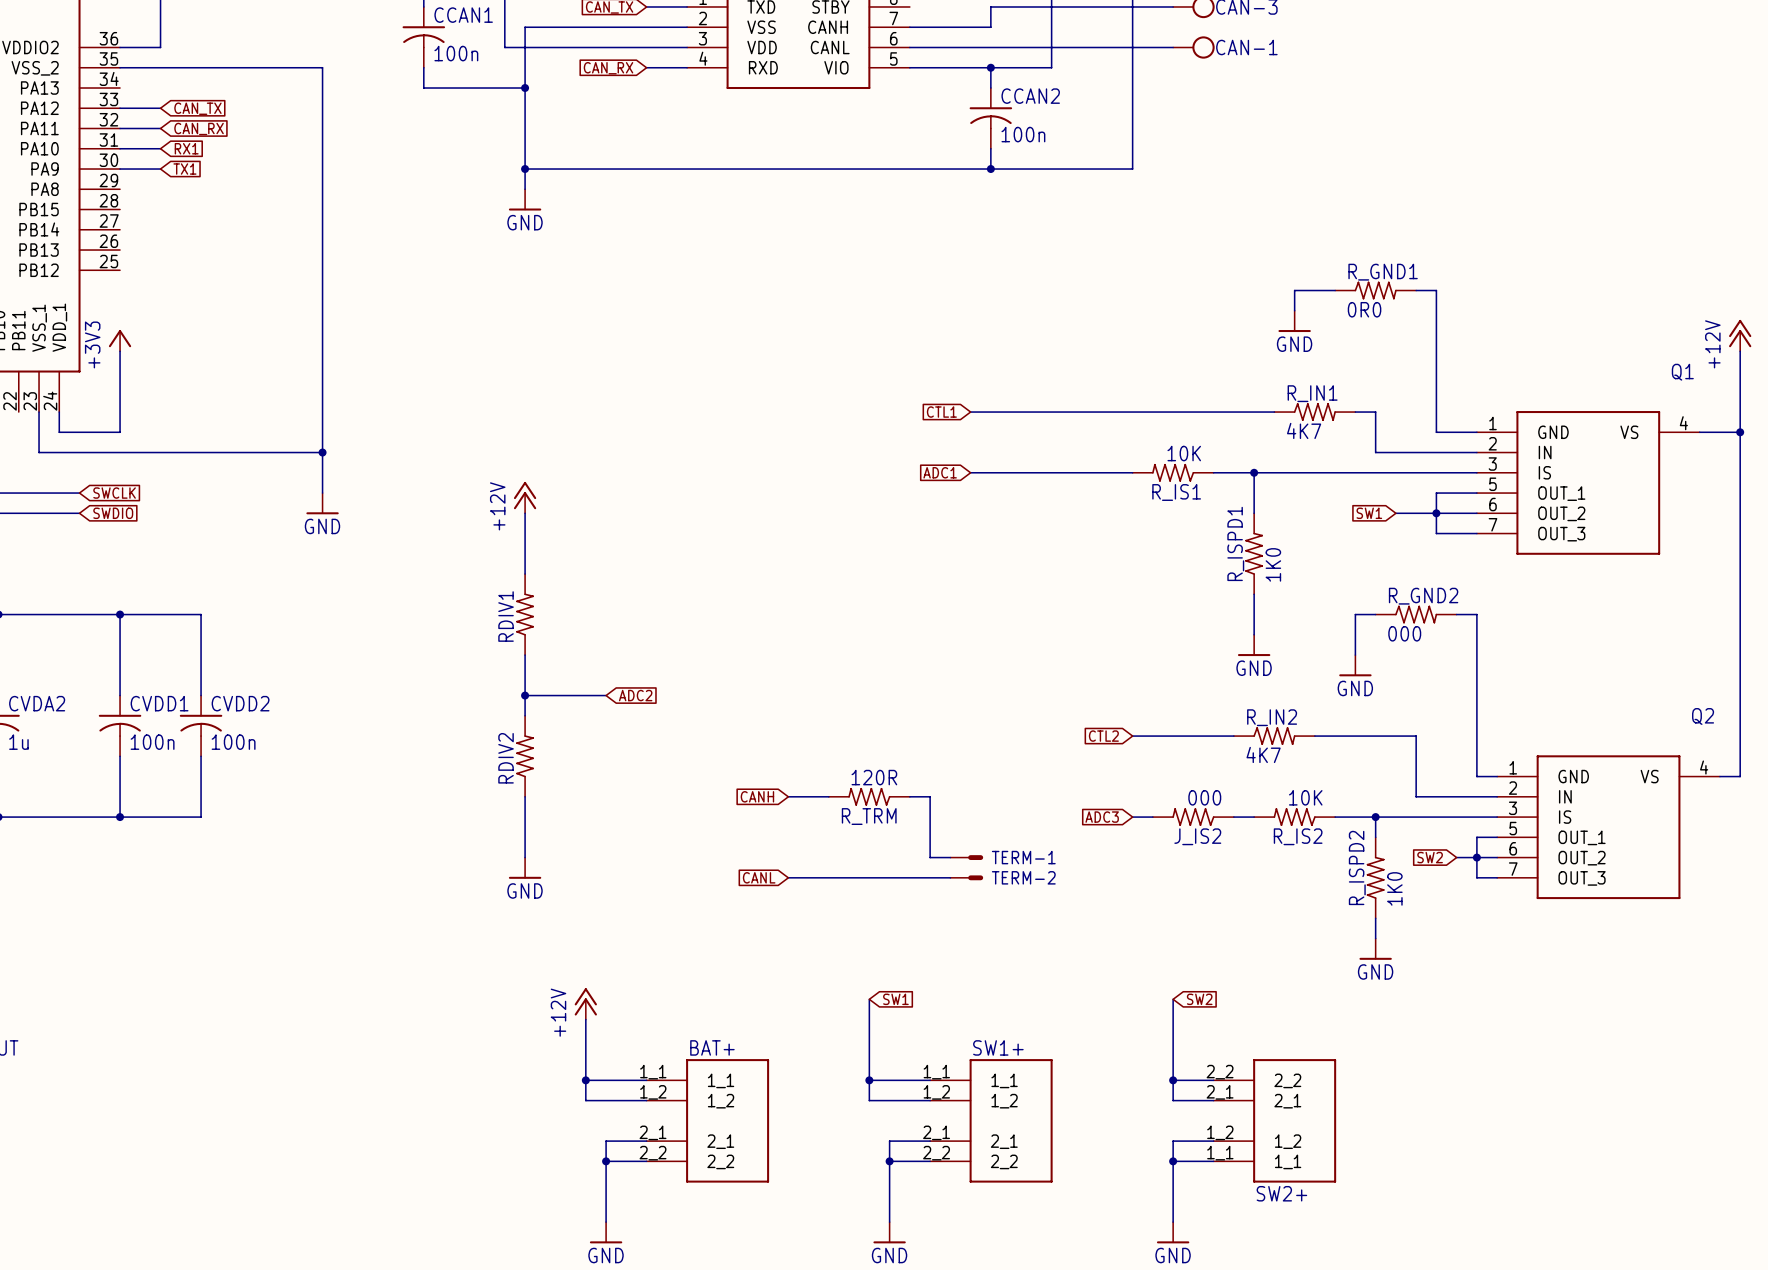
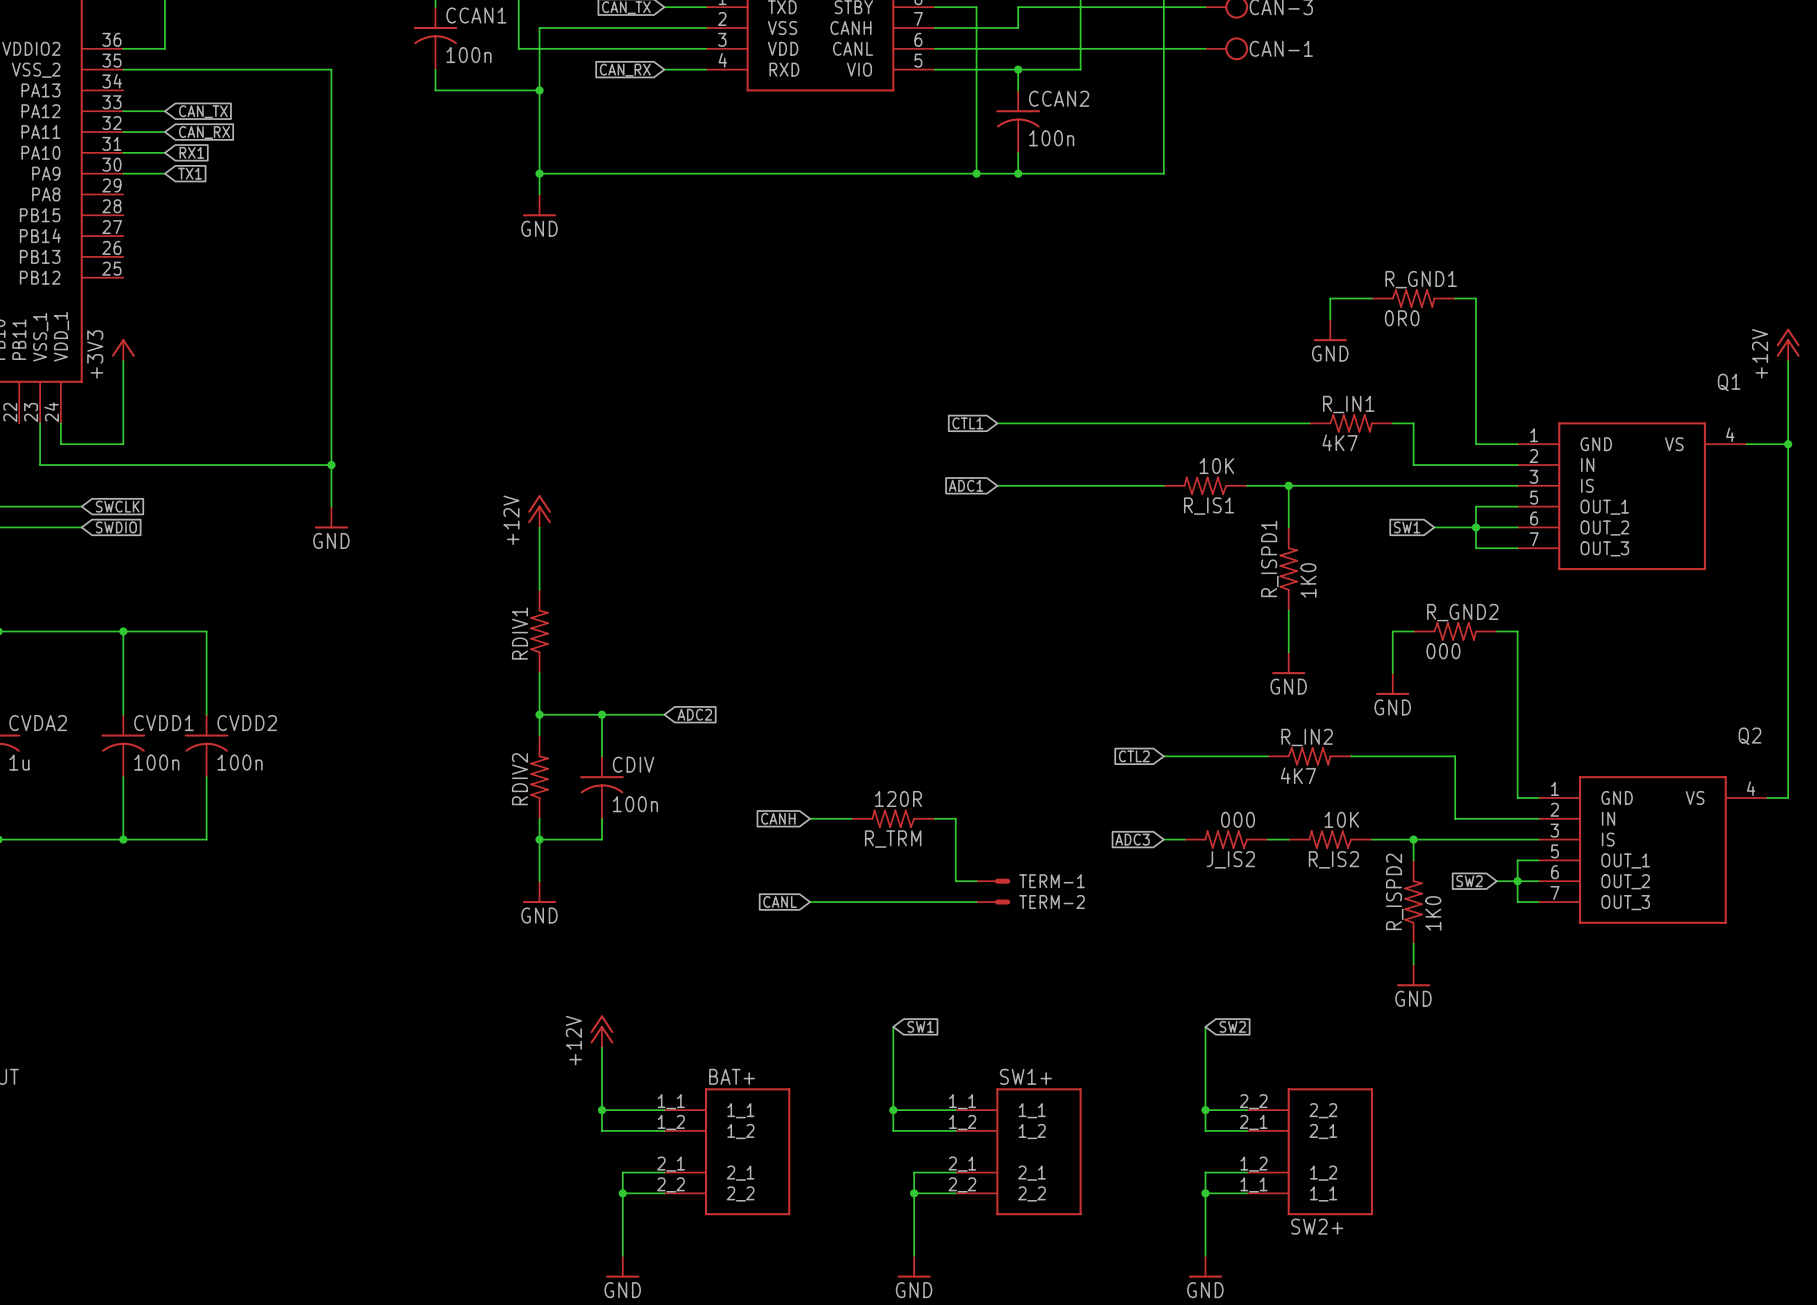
wire: none -> (934, 7) (976, 7) (976, 173)
junction: none -> (976, 173)
wire: none -> (601, 714) (601, 756)
junction: none -> (601, 714)
wire: none -> (622, 714) (664, 714)
global label position: ADC2 (635, 695) -> ADC2 (694, 714)
CDIV: none -> 100n (601, 787)
wire: none -> (601, 818) (601, 839) (539, 839)
junction: none -> (539, 839)

